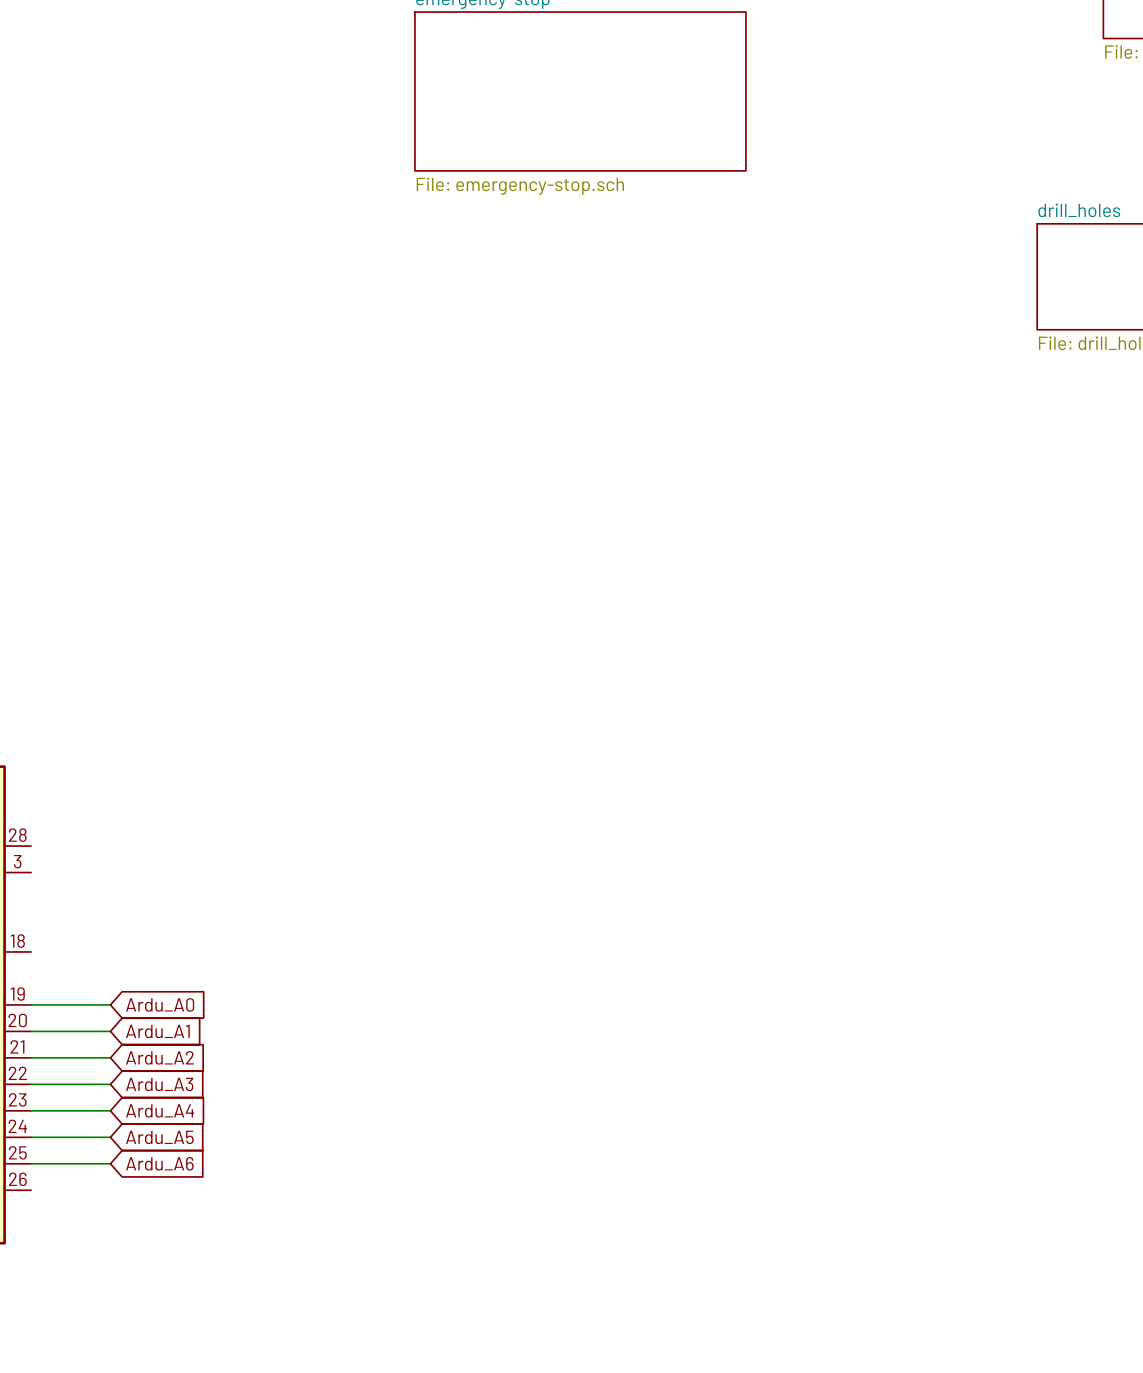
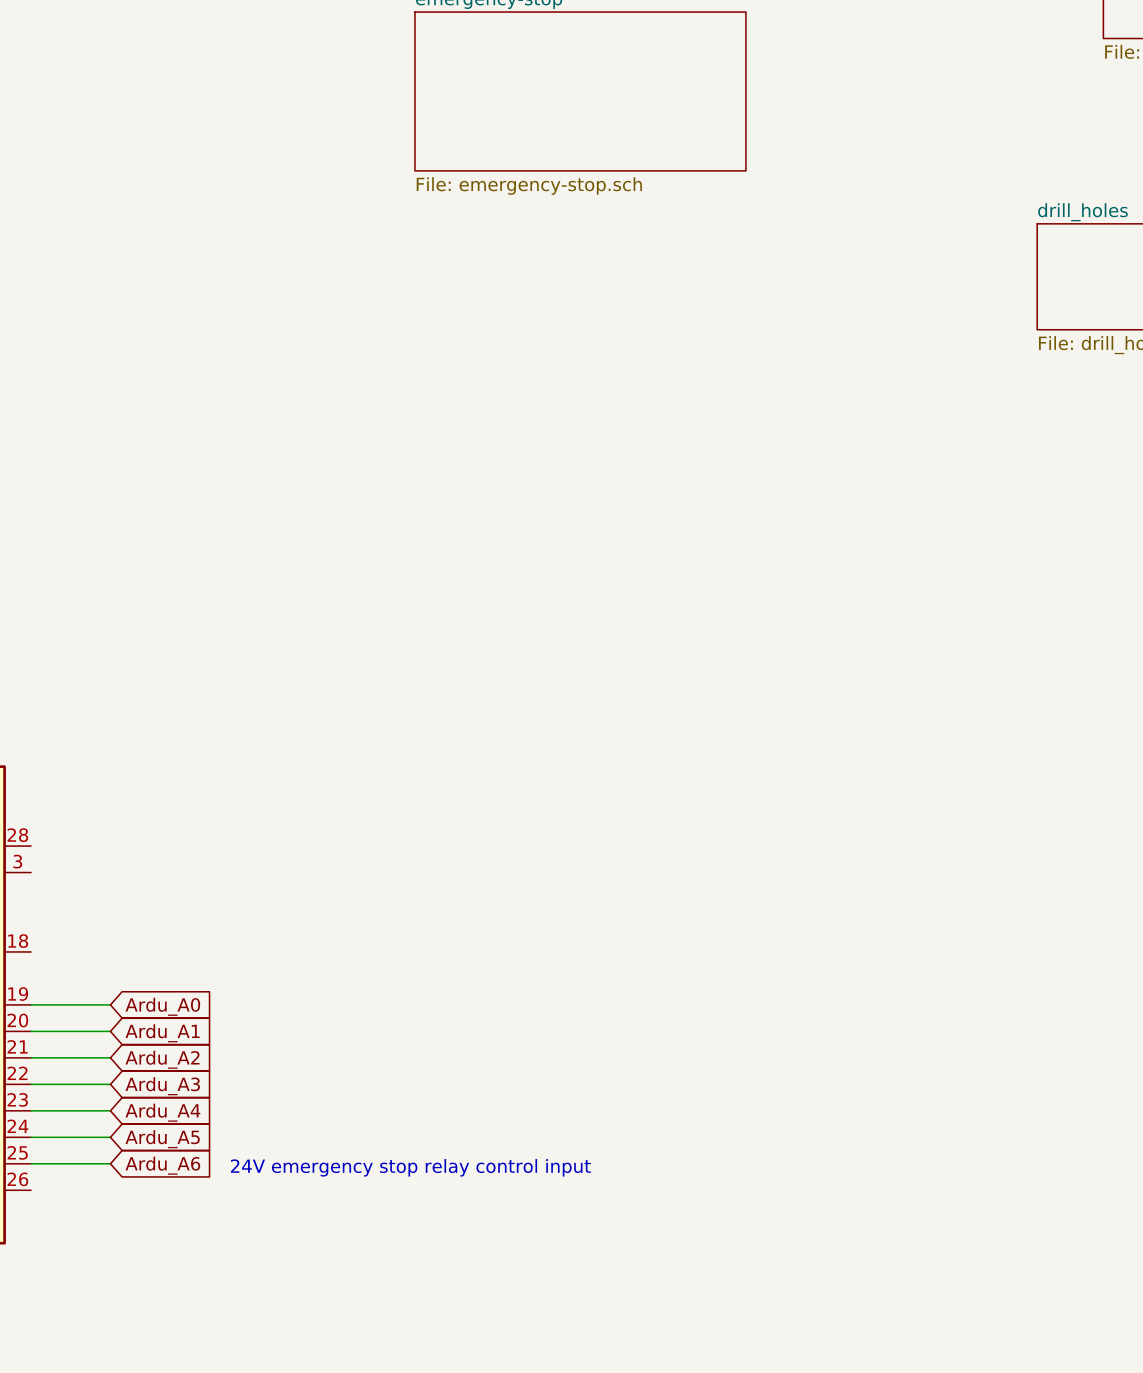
text: none -> 24V emergency stop relay control input (410, 1167)

